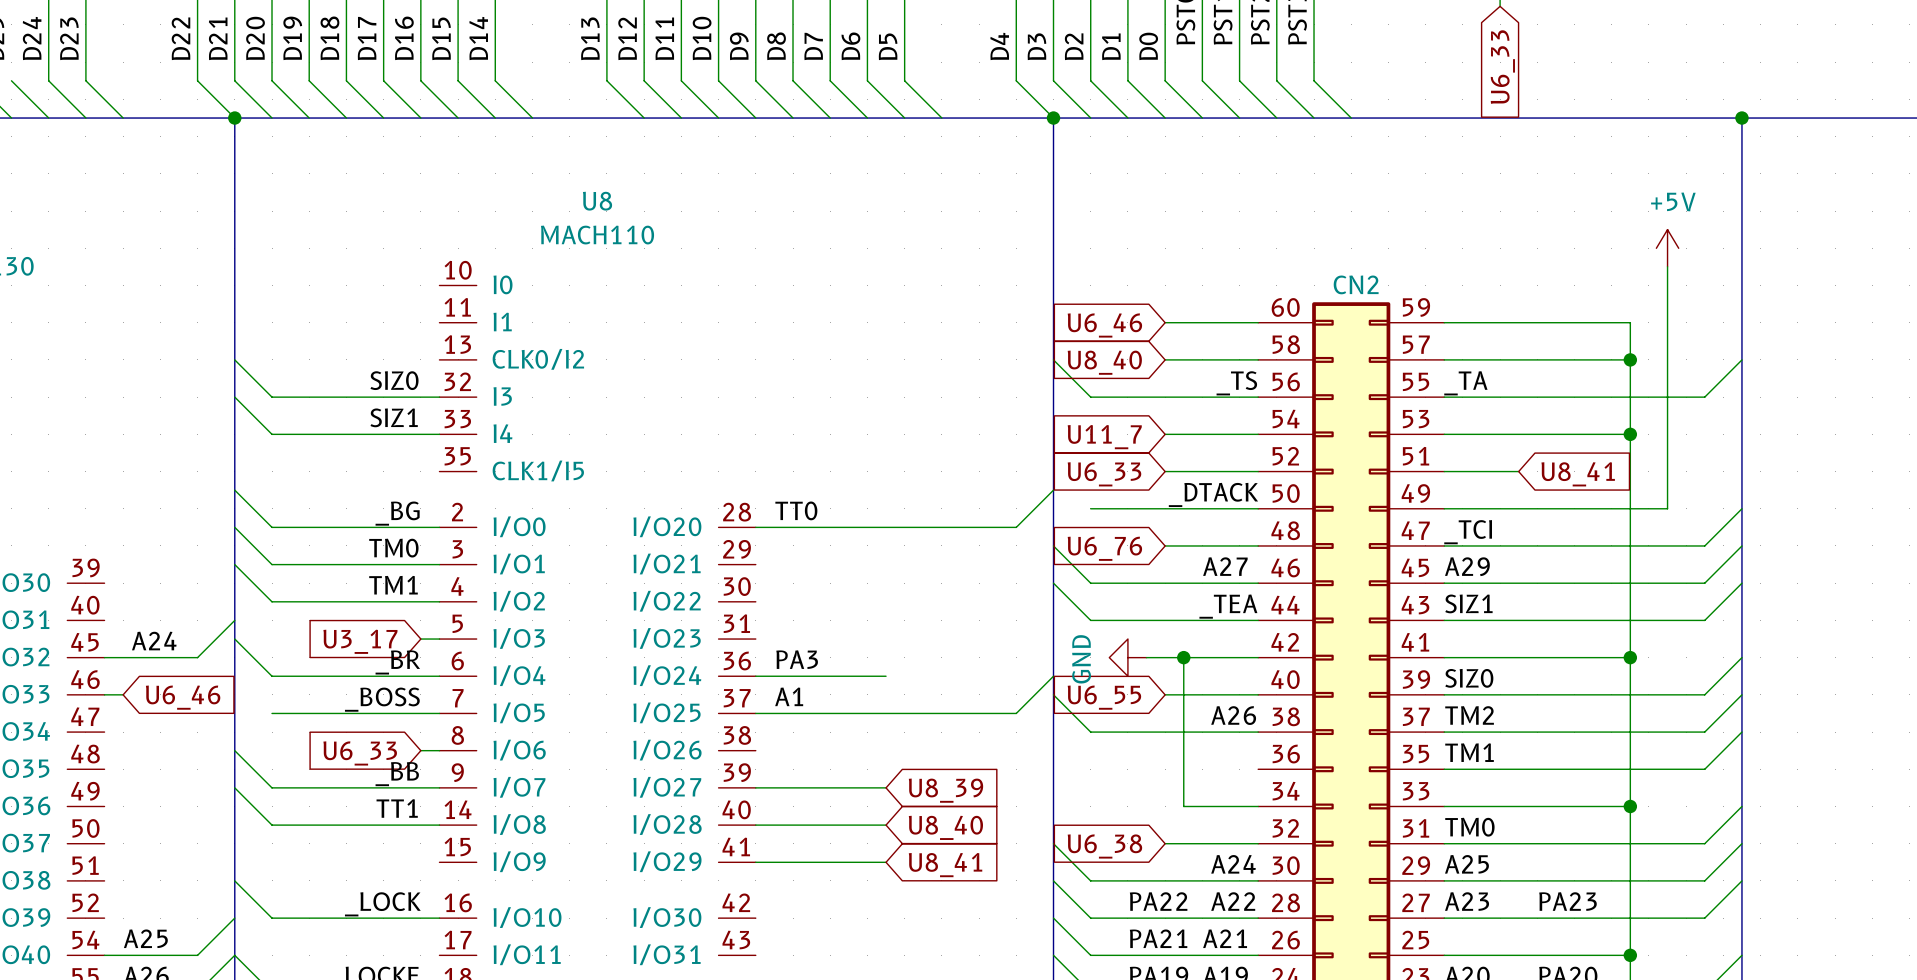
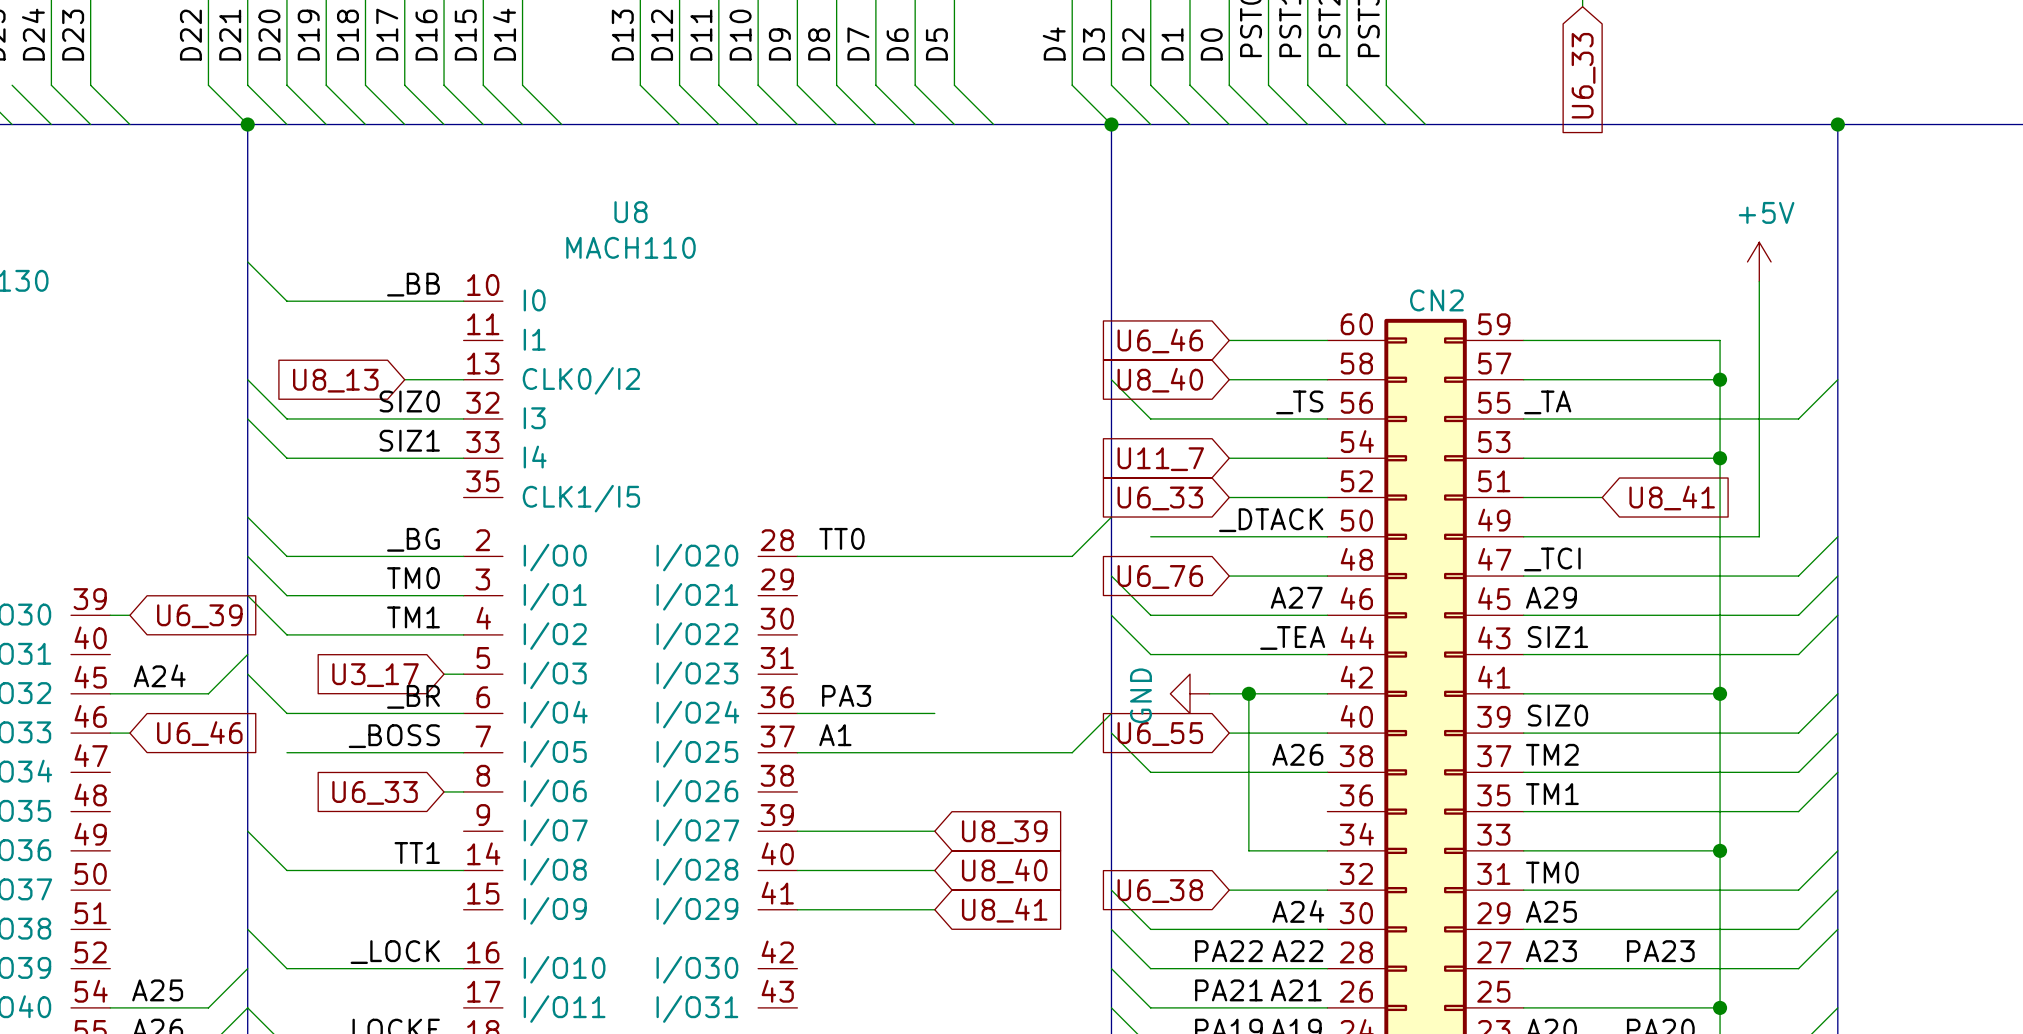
wire: none -> (247, 261) (286, 301) (463, 301)
label: none -> _BB (413, 284)
wire: none -> (404, 379) (463, 379)
global label: none -> U8_13 (335, 380)
wire: none -> (110, 615) (129, 615)
global label: none -> U6_39 (199, 616)
wire: (234, 750) (272, 787) (439, 787) -> none
label: _BB (397, 774) -> none

